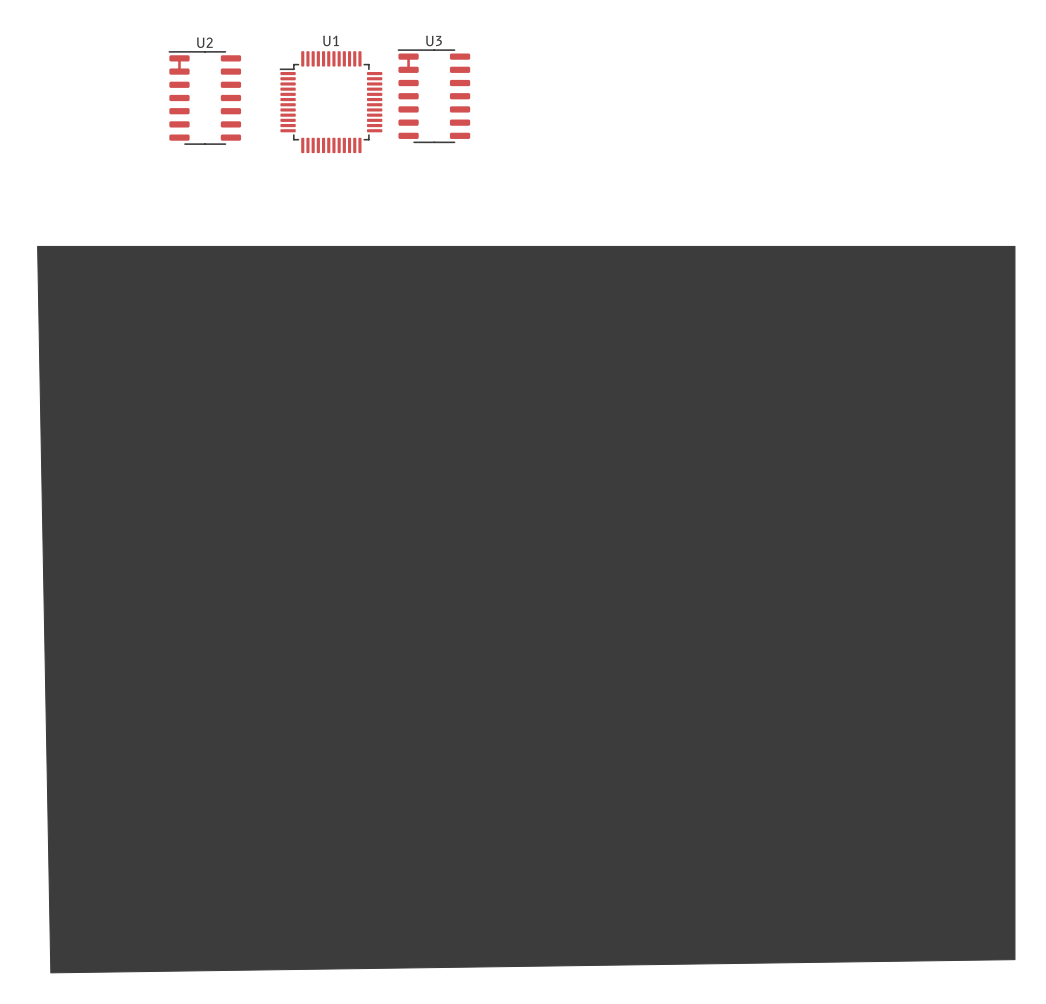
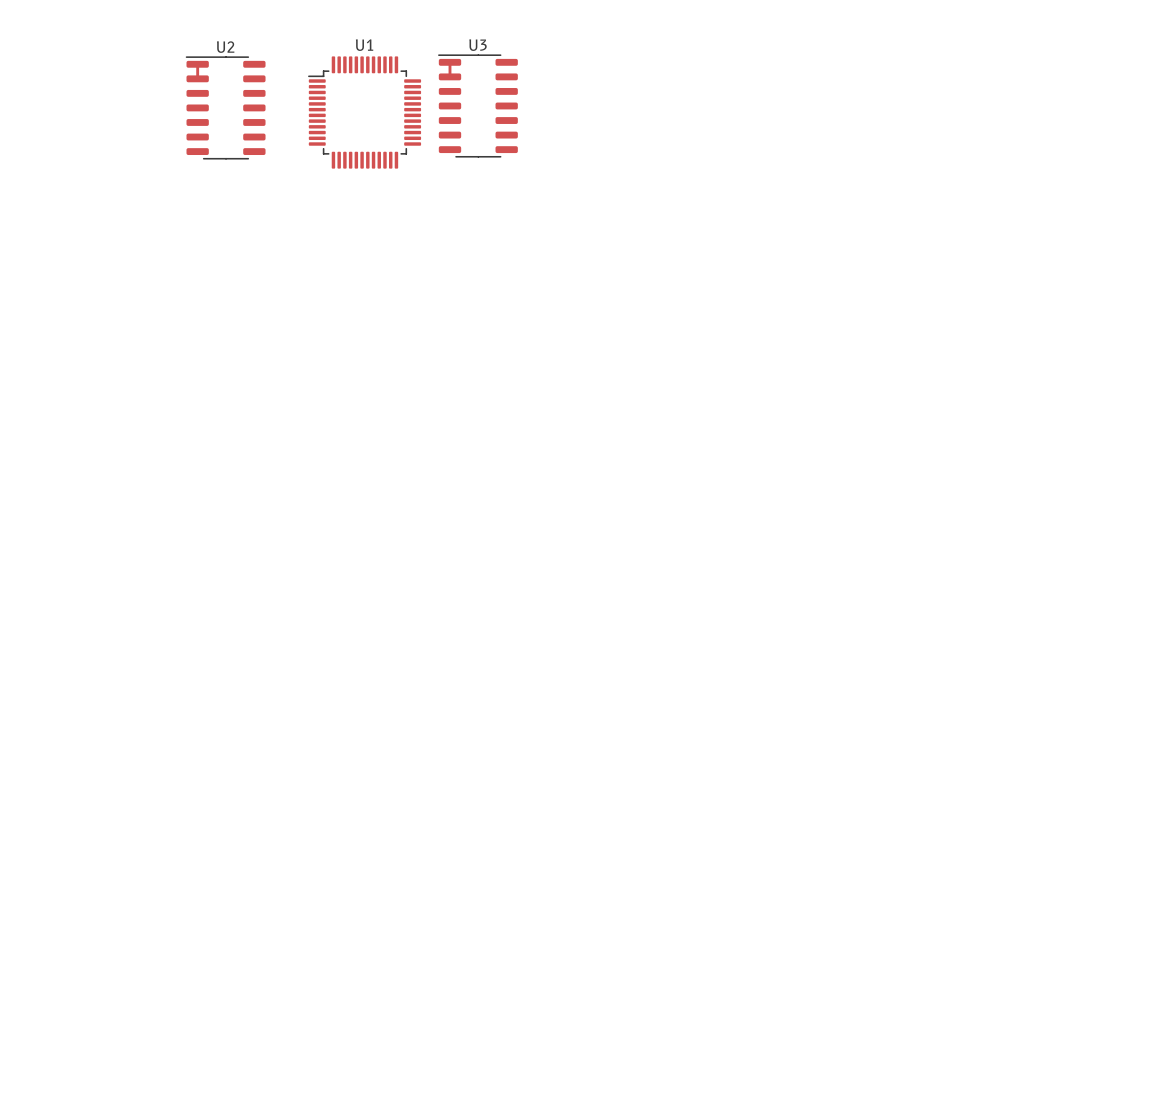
drawing: [37, 245, 1016, 974] -> none

